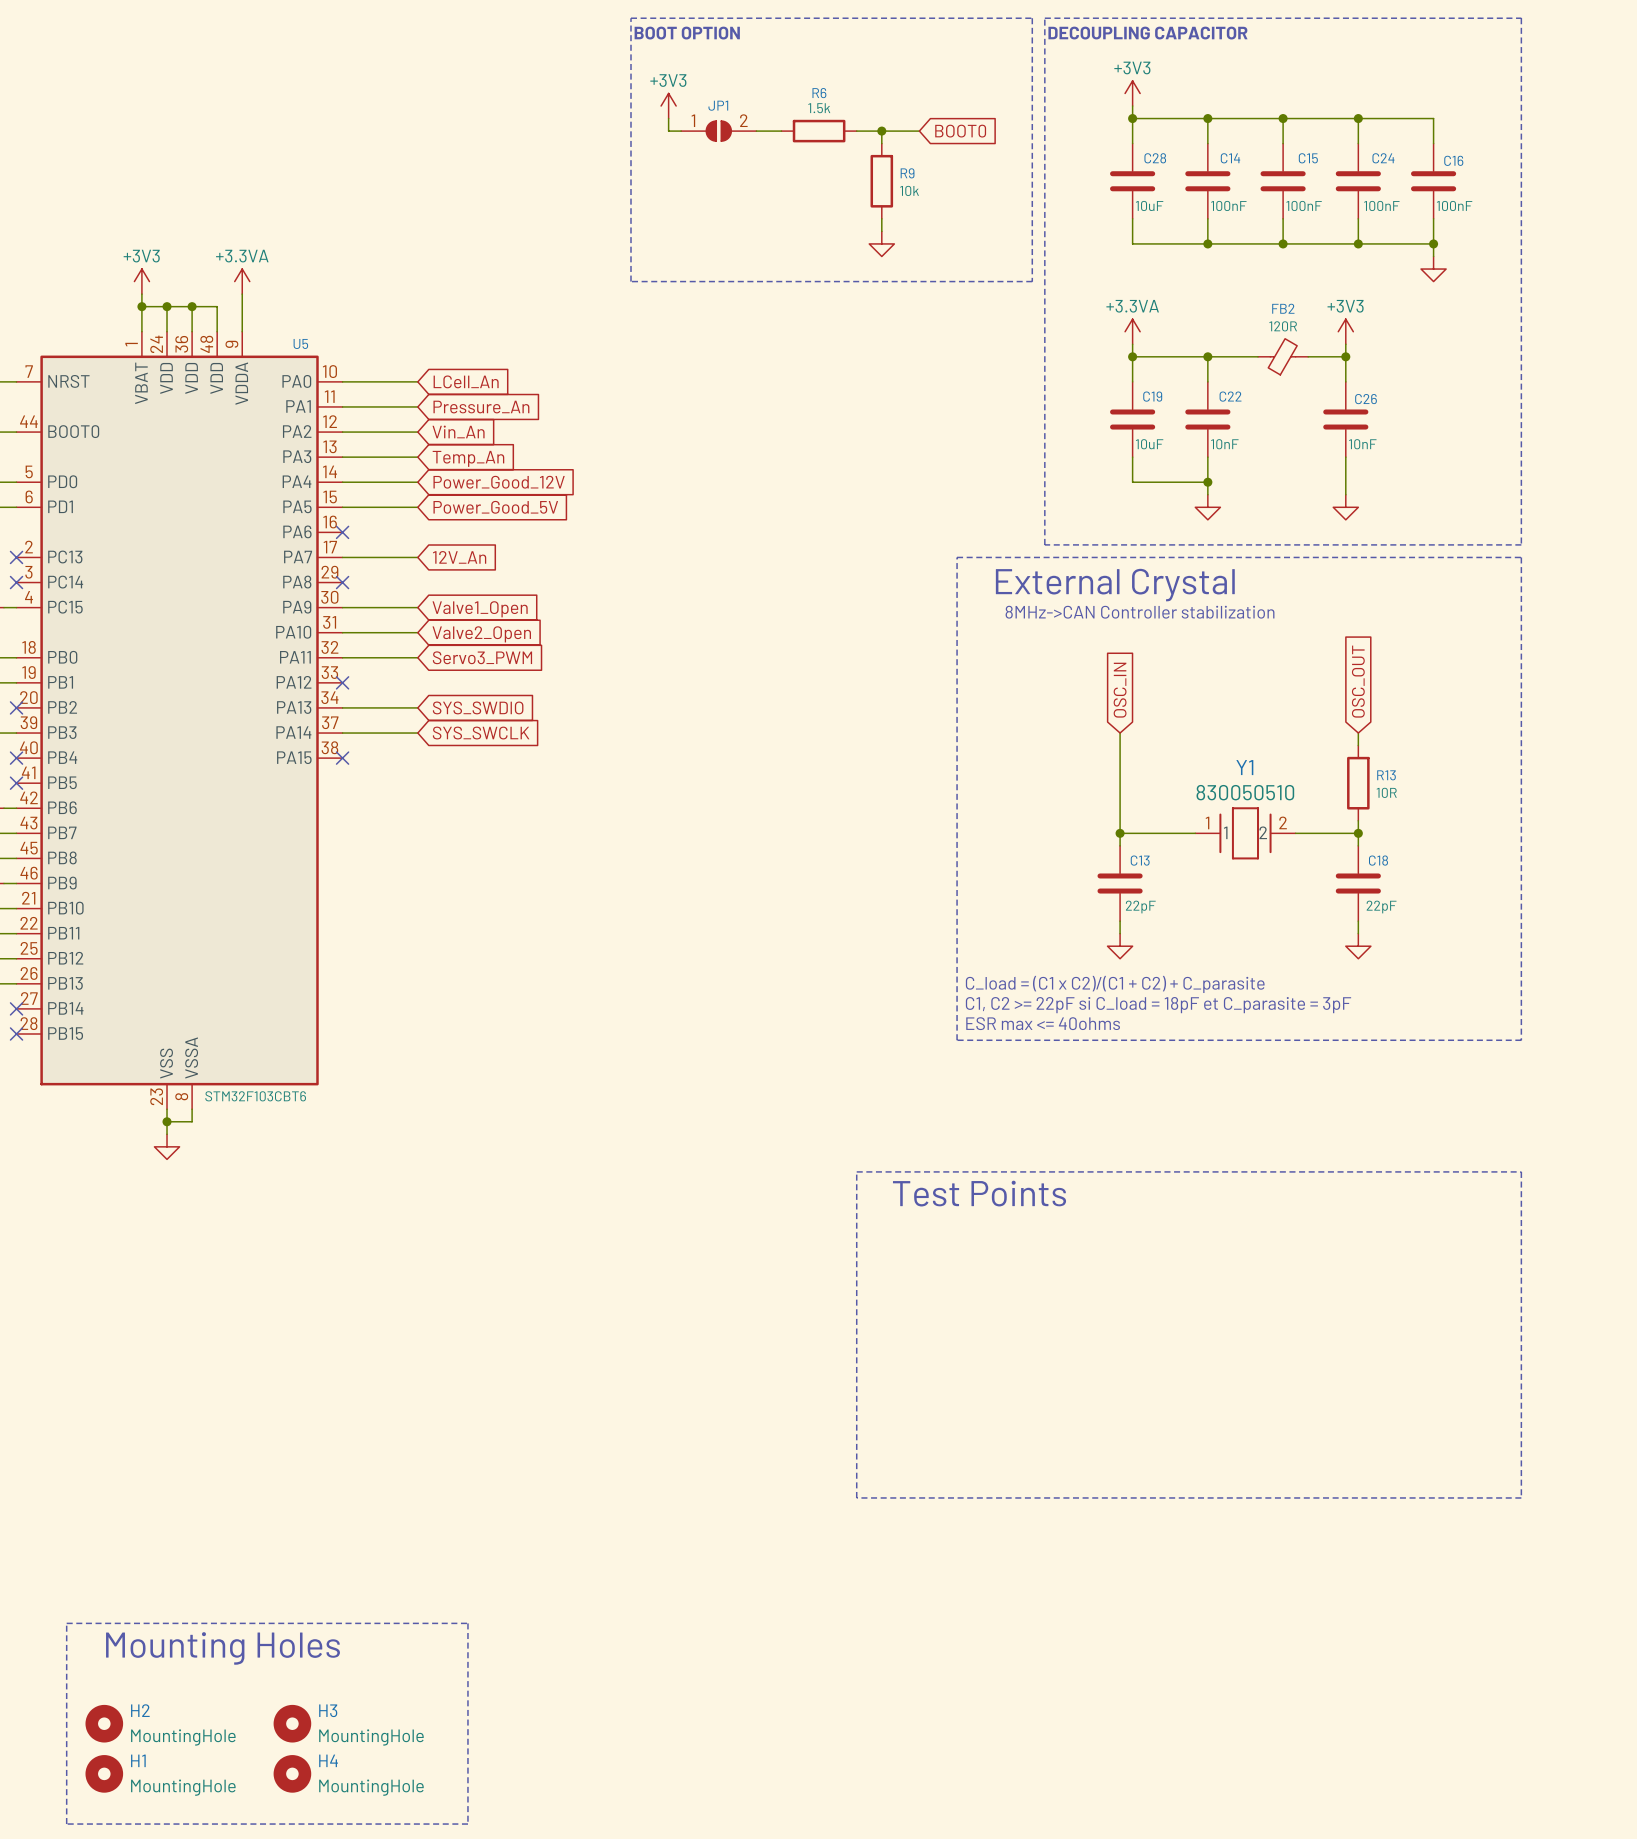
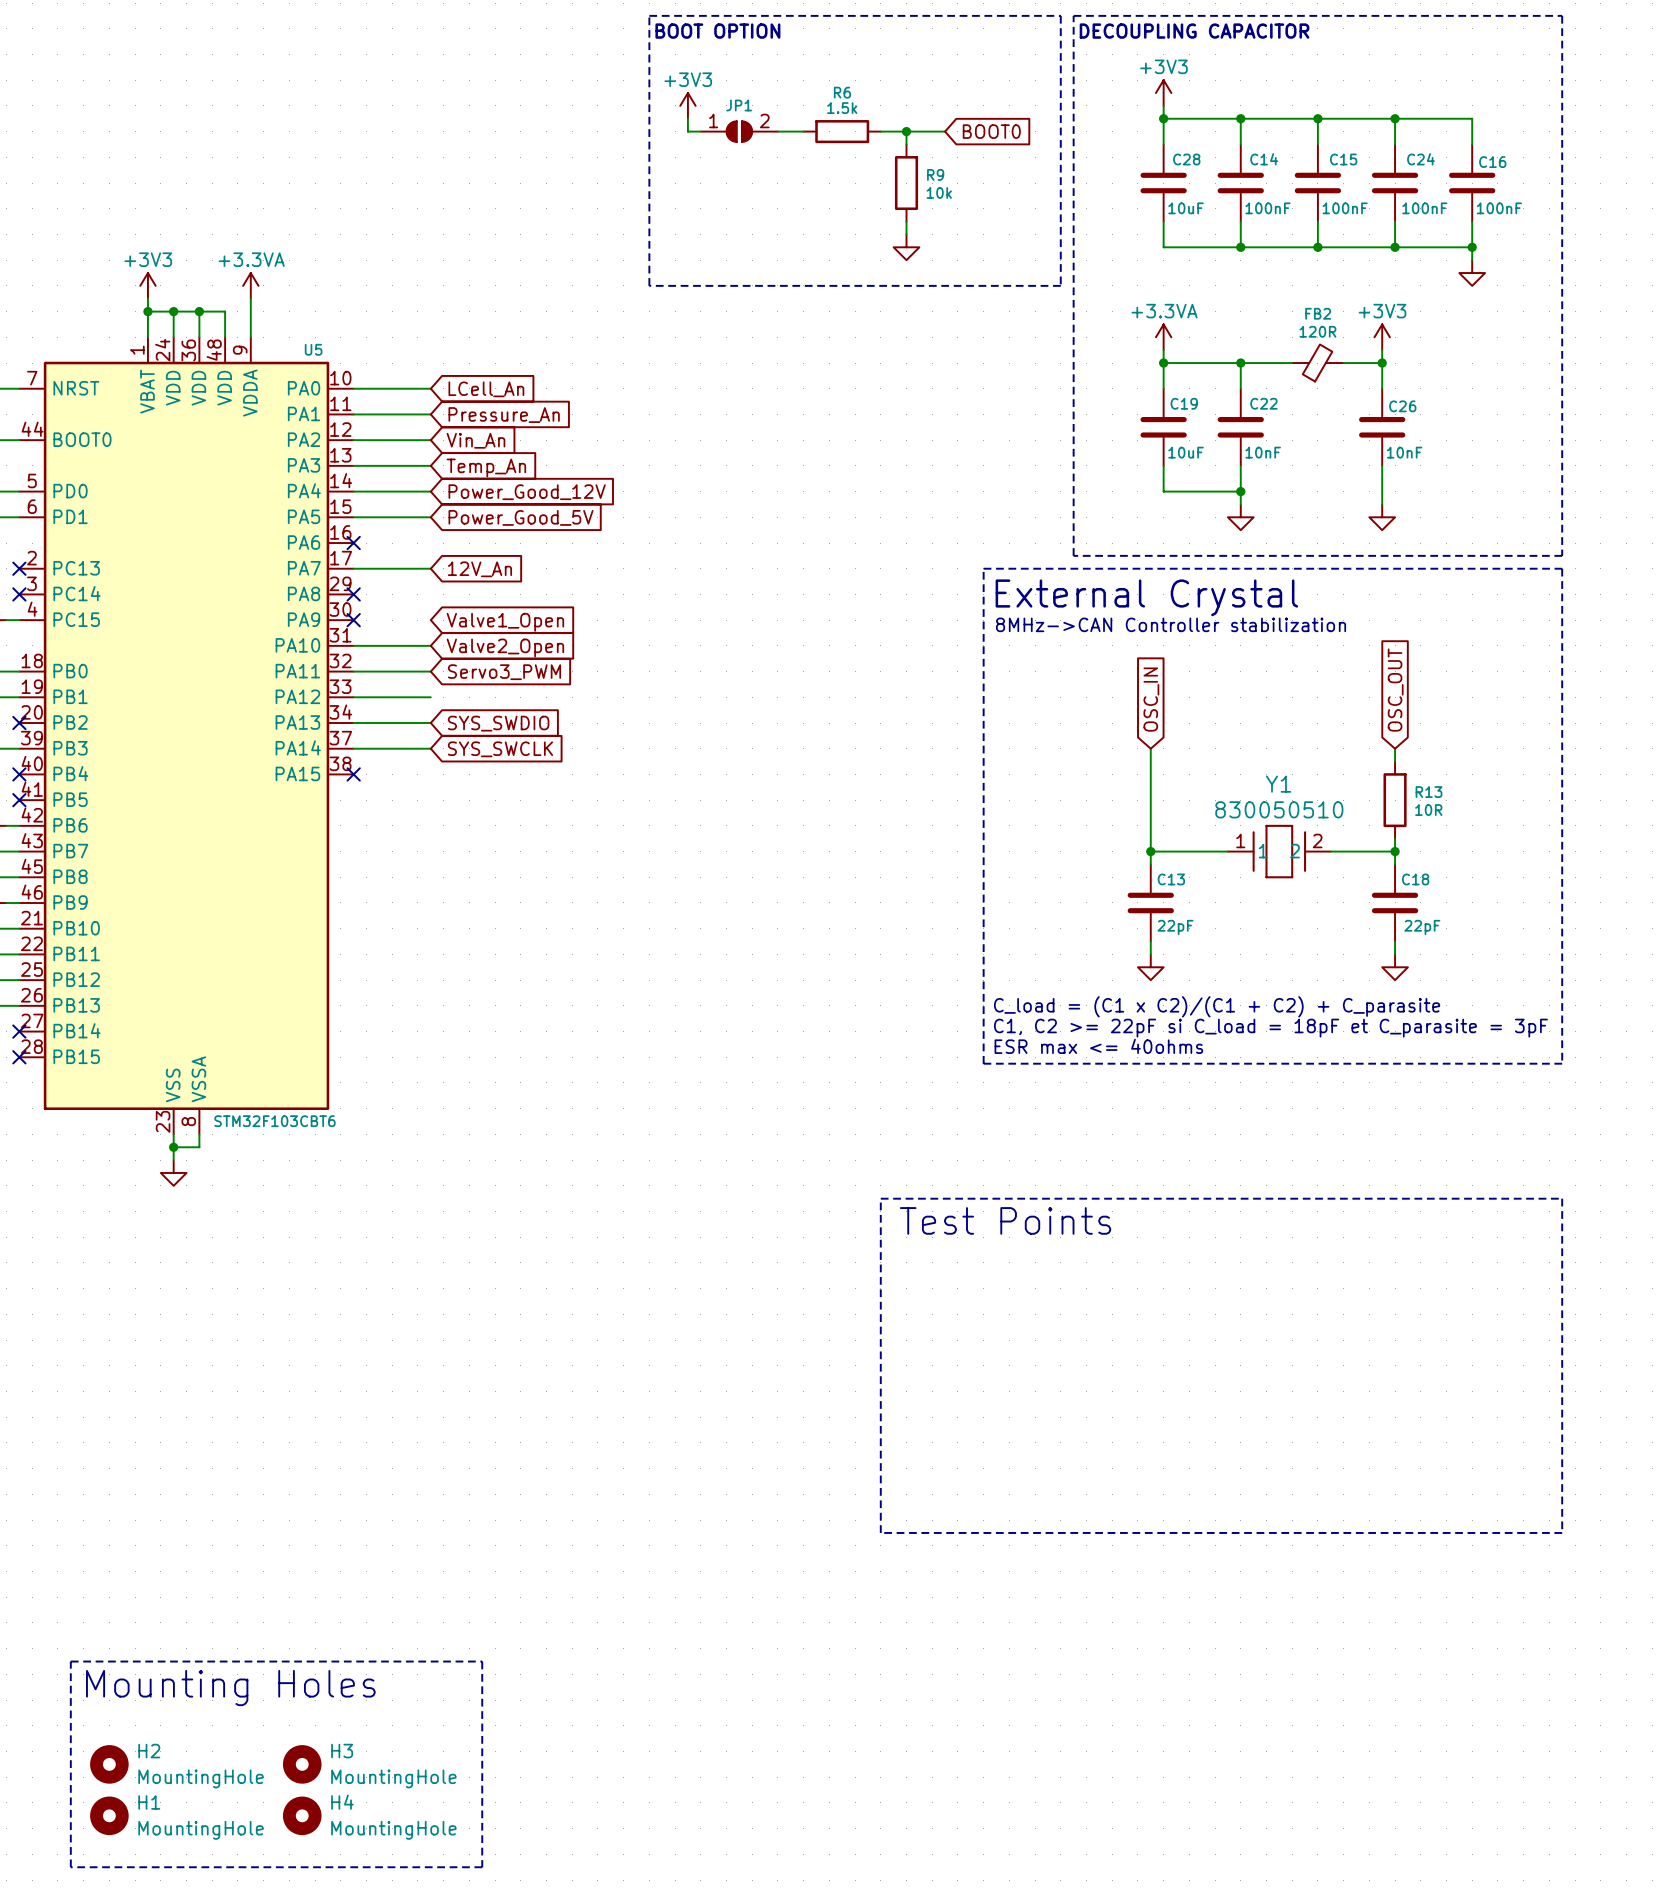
wire: (342, 607) (417, 607) -> (353, 697) (430, 697)
no-connect mark: none -> (353, 620)
no-connect mark: (342, 682) -> none

